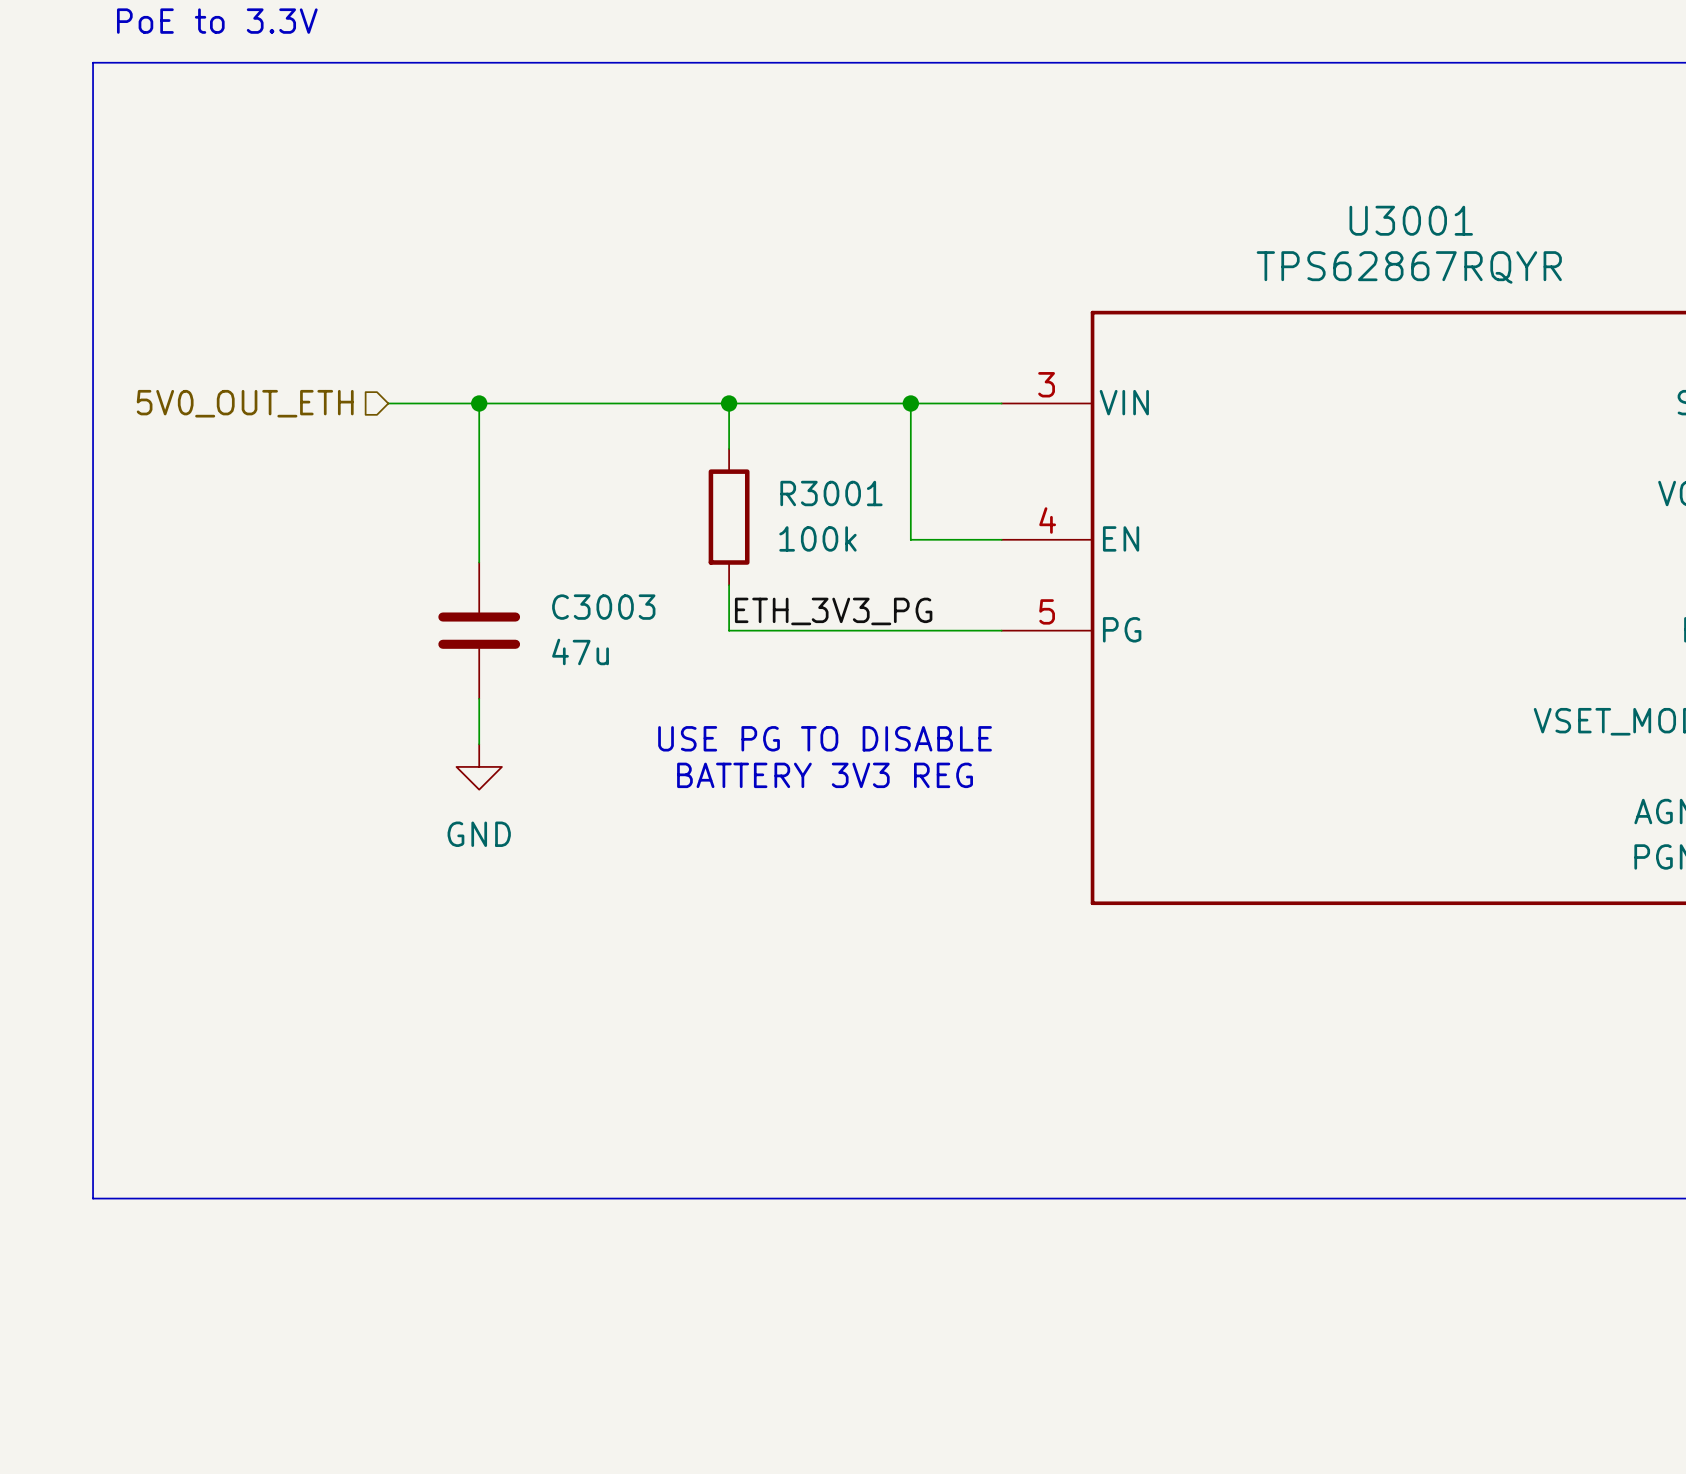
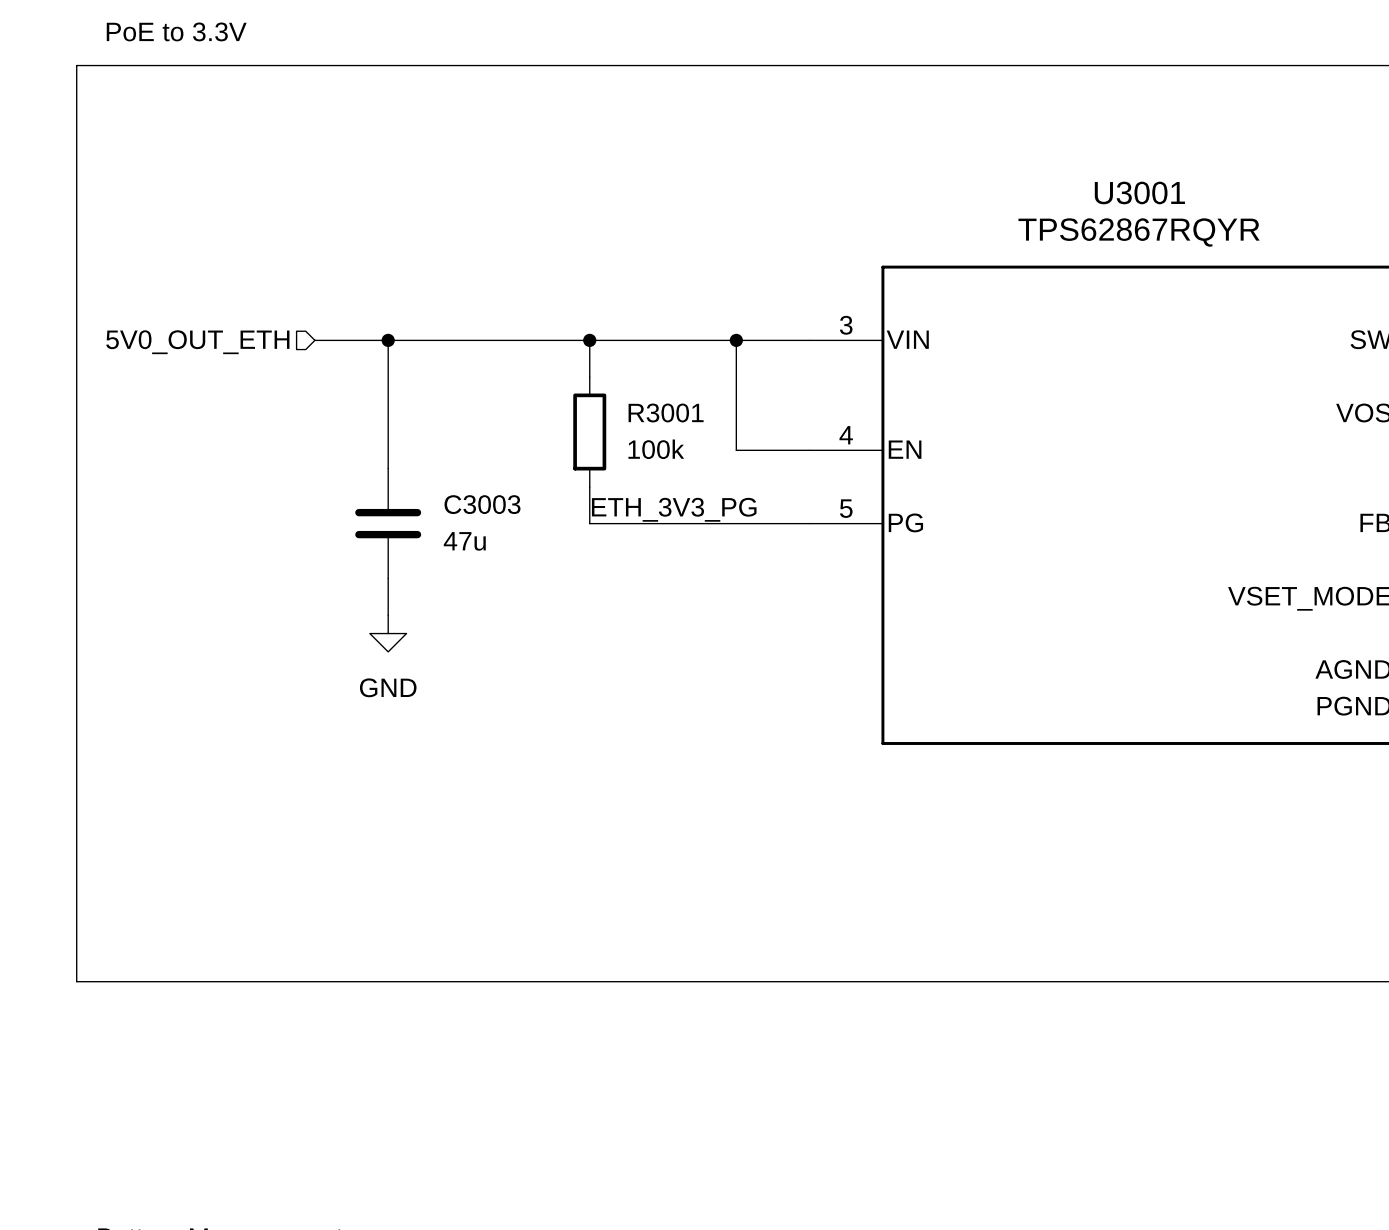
text: USE PG TO DISABLE (825, 738) -> none
text: BATTERY 3V3 REG (825, 775) -> none

